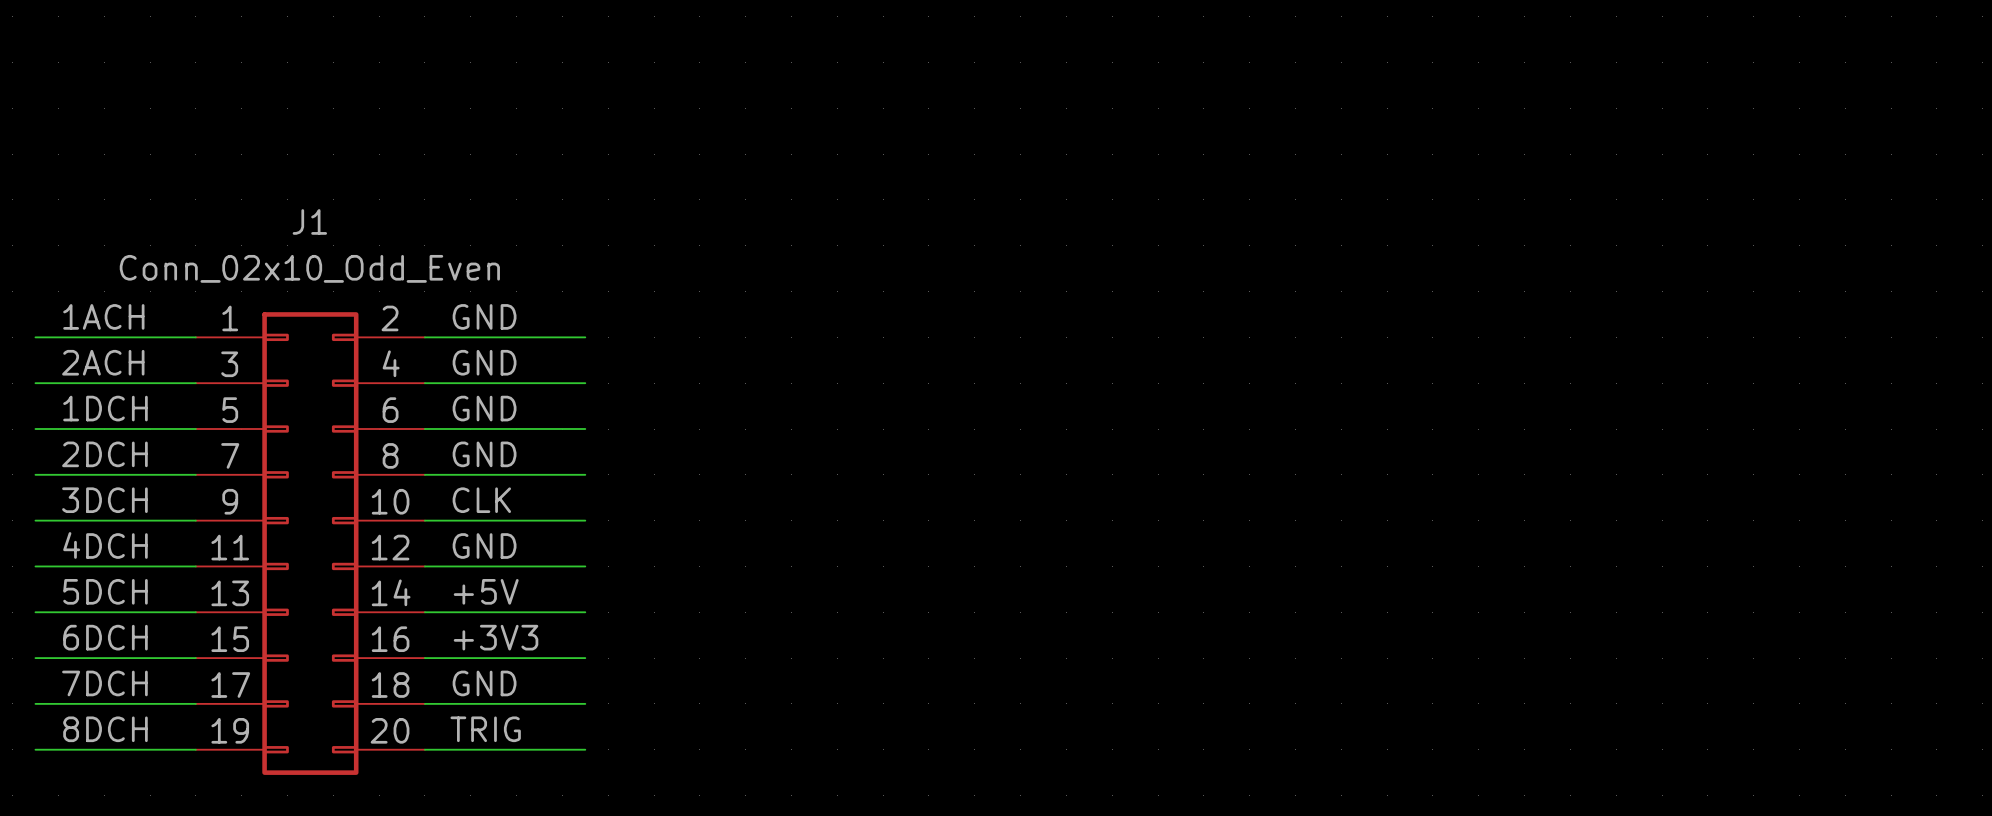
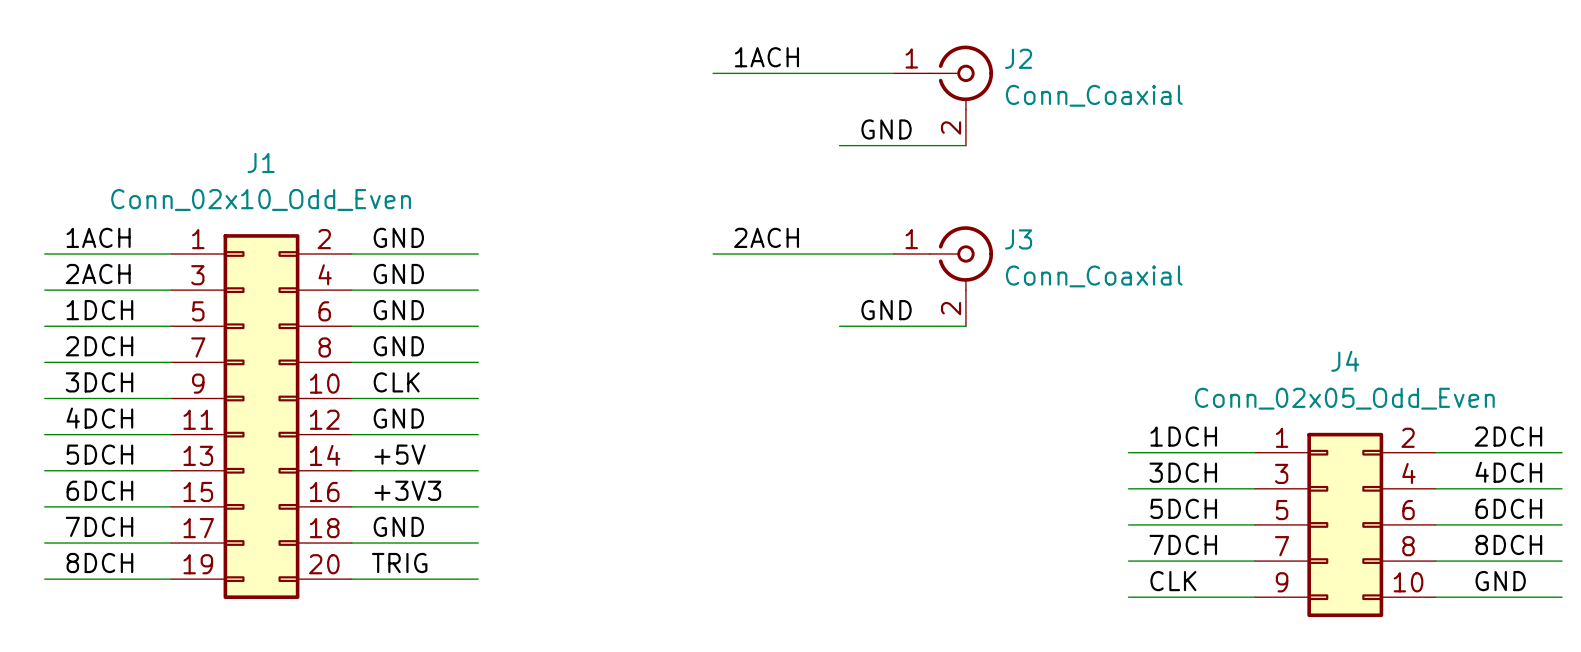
label: none -> 1ACH (766, 57)
wire: none -> (713, 73) (893, 73)
J2: none -> Conn_Coaxial (943, 95)
label: none -> GND (886, 129)
wire: none -> (839, 145) (965, 145)
label: none -> 2ACH (766, 237)
wire: none -> (713, 254) (893, 254)
J3: none -> Conn_Coaxial (943, 276)
label: none -> GND (886, 310)
wire: none -> (839, 326) (965, 326)
label: none -> 1DCH (1183, 436)
label: none -> 2DCH (1508, 436)
wire: none -> (1128, 452) (1254, 452)
wire: none -> (1435, 452) (1562, 452)
label: none -> 3DCH (1183, 472)
label: none -> 4DCH (1508, 472)
wire: none -> (1128, 488) (1254, 488)
wire: none -> (1435, 488) (1562, 488)
label: none -> 5DCH (1183, 508)
label: none -> 6DCH (1508, 508)
wire: none -> (1128, 524) (1254, 524)
J4: none -> Conn_02x05_Odd_Even (1345, 524)
wire: none -> (1435, 524) (1562, 524)
label: none -> 7DCH (1183, 544)
label: none -> 8DCH (1508, 544)
wire: none -> (1128, 561) (1254, 561)
wire: none -> (1435, 561) (1562, 561)
label: none -> CLK (1173, 581)
label: none -> GND (1500, 581)
wire: none -> (1128, 597) (1254, 597)
wire: none -> (1435, 597) (1562, 597)

